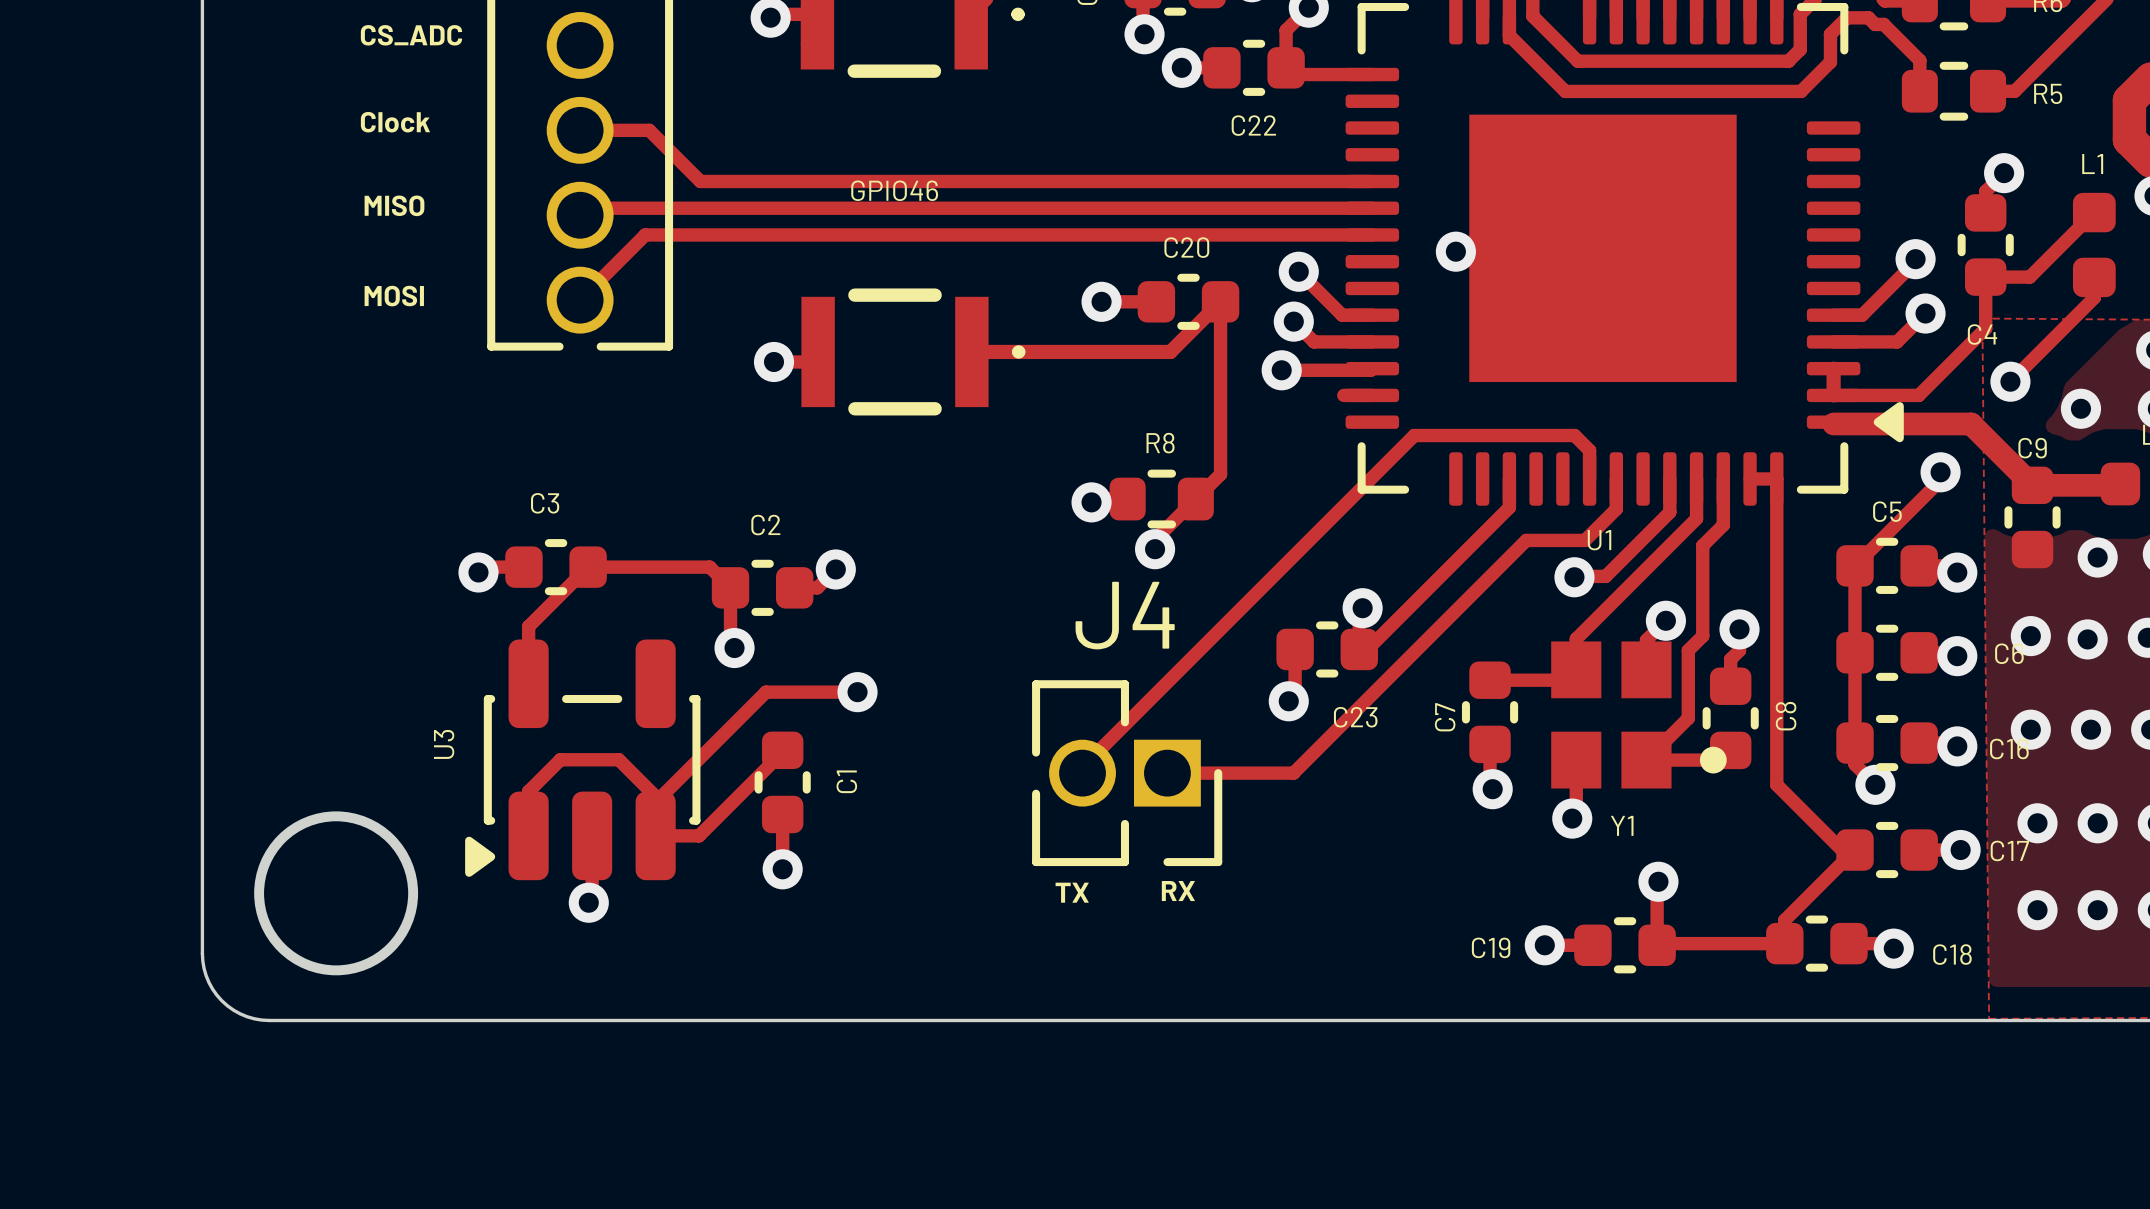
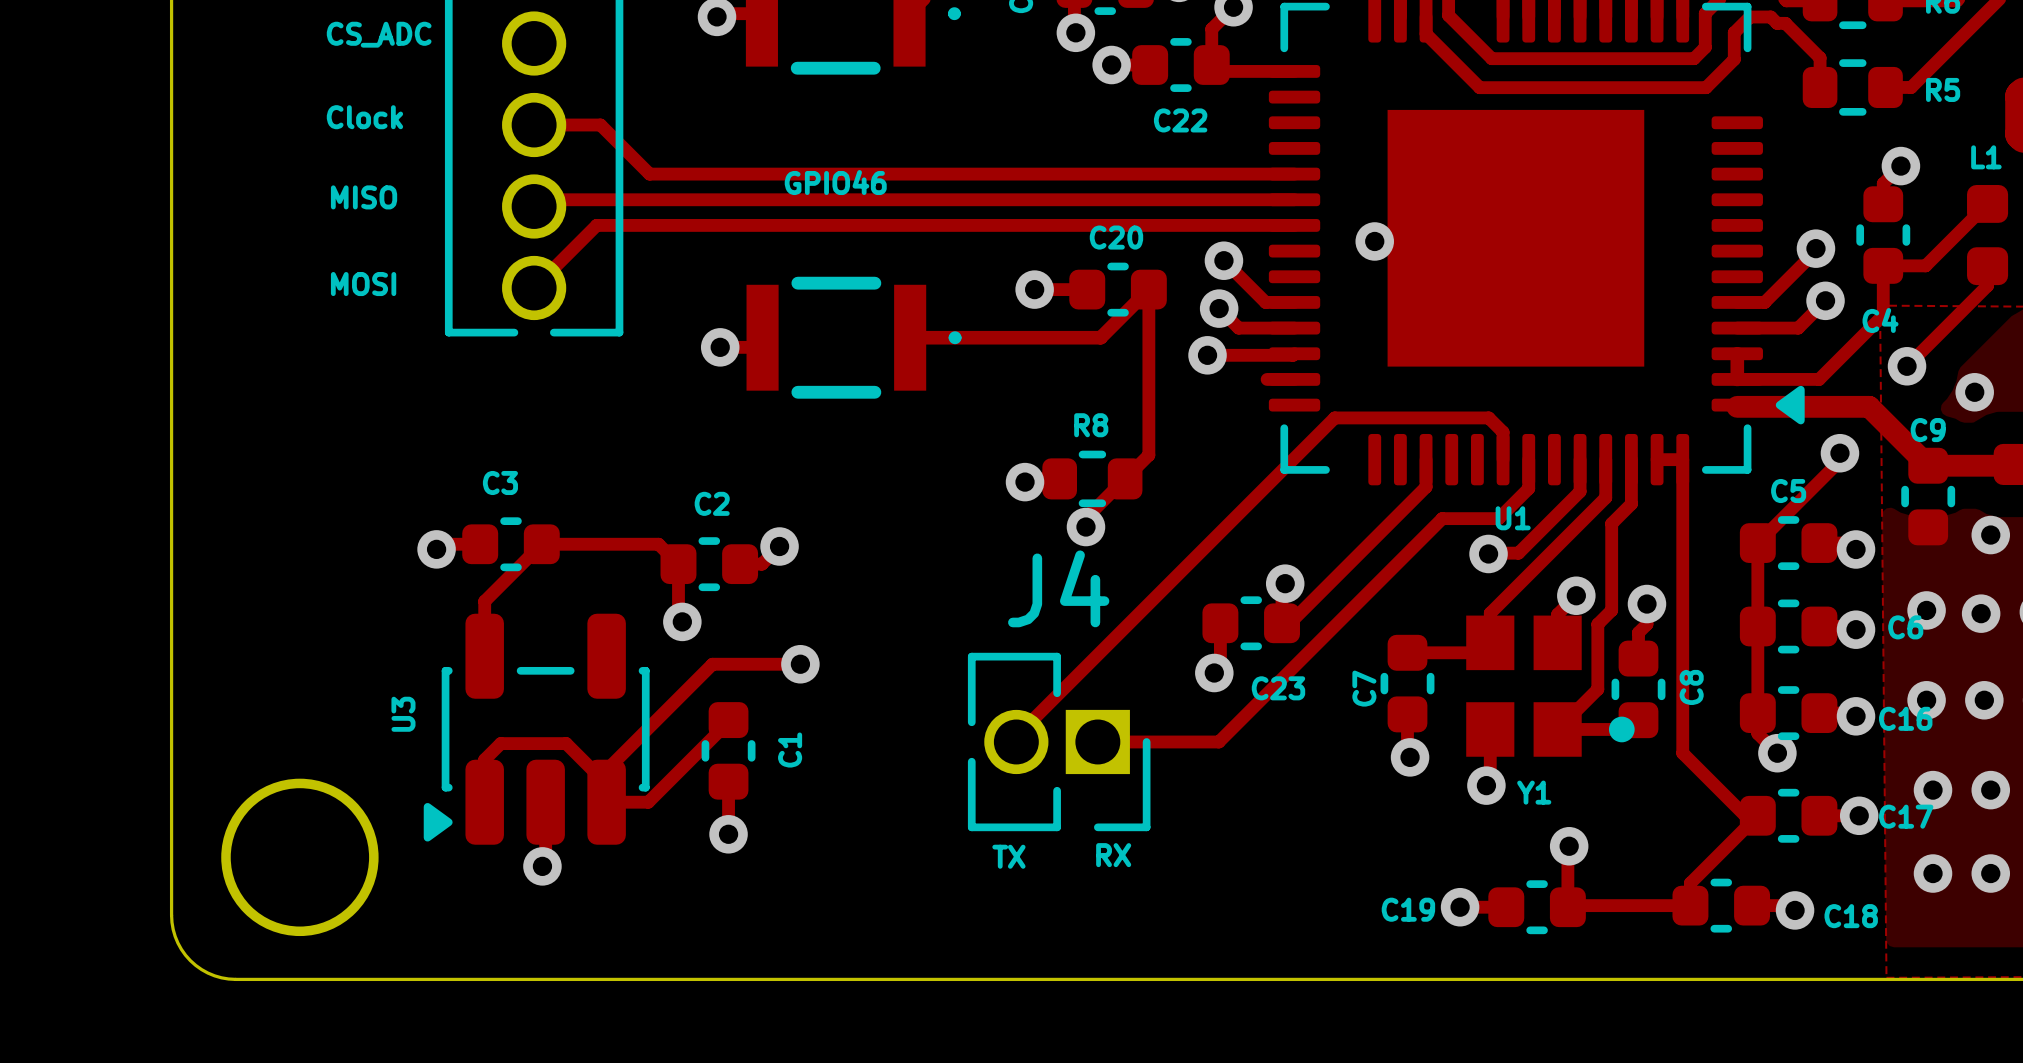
track: (545, 774) (560, 759) (618, 759) (655, 796) (655, 802) -> (500, 743) (566, 743) (606, 784)

